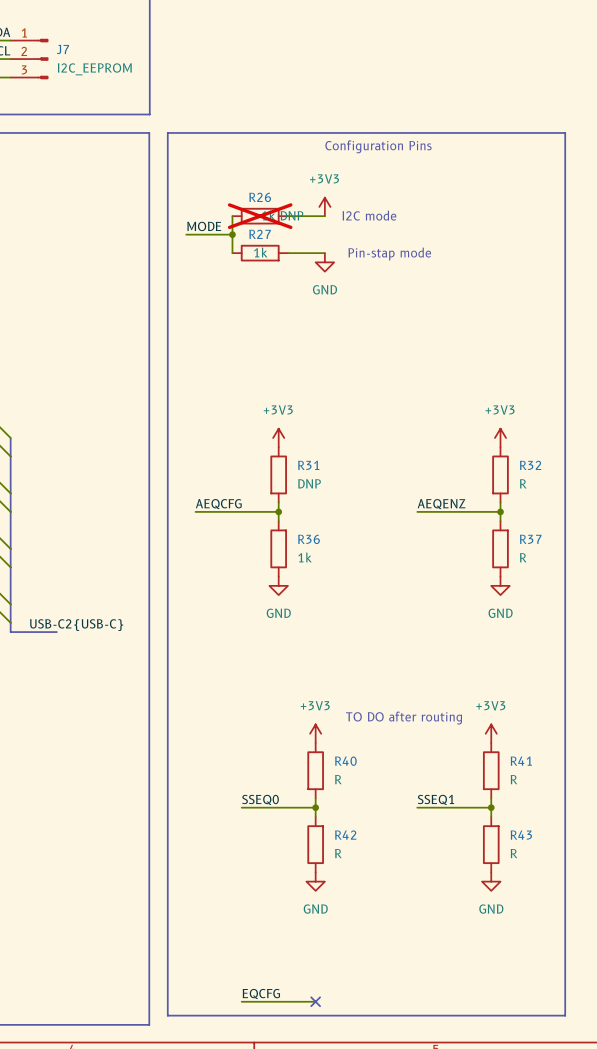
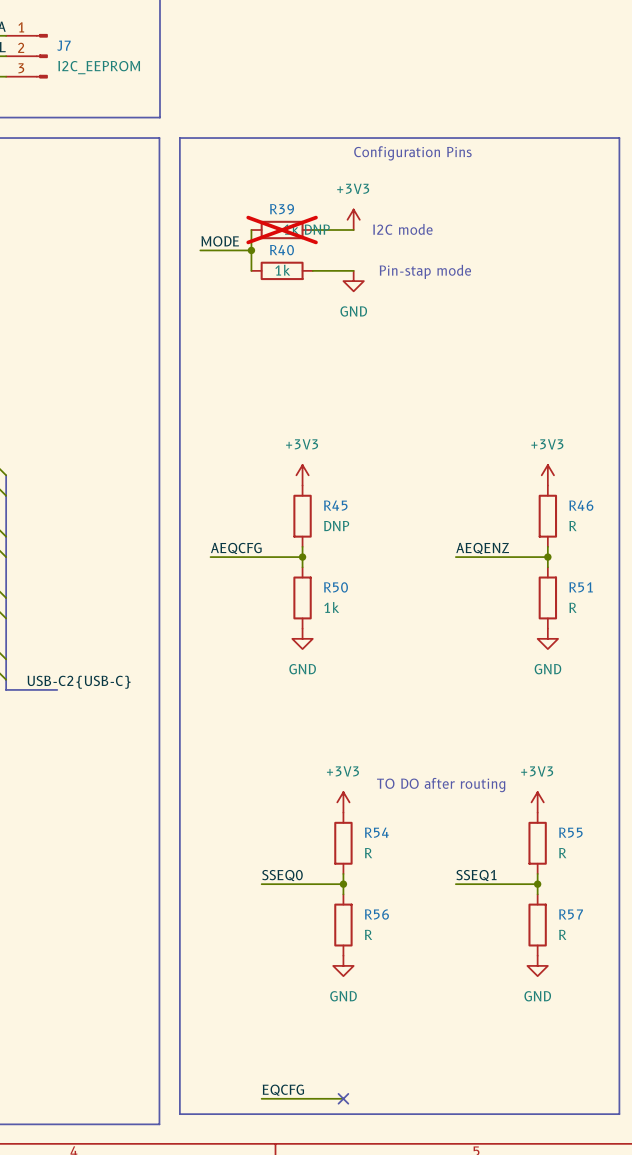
R26 name: R26 (260, 197) -> R39 (282, 209)
R27 name: R27 (260, 234) -> R40 (281, 250)
R31 name: R31 (308, 465) -> R45 (335, 505)
R32 name: R32 (530, 465) -> R46 (581, 505)
R36 name: R36 (308, 539) -> R50 (335, 587)
R37 name: R37 (530, 539) -> R51 (581, 587)
R40 name: R40 (345, 761) -> R54 (376, 832)
R41 name: R41 (521, 761) -> R55 (570, 832)
R42 name: R42 (345, 835) -> R56 (376, 914)
R43 name: R43 (521, 835) -> R57 (571, 914)

